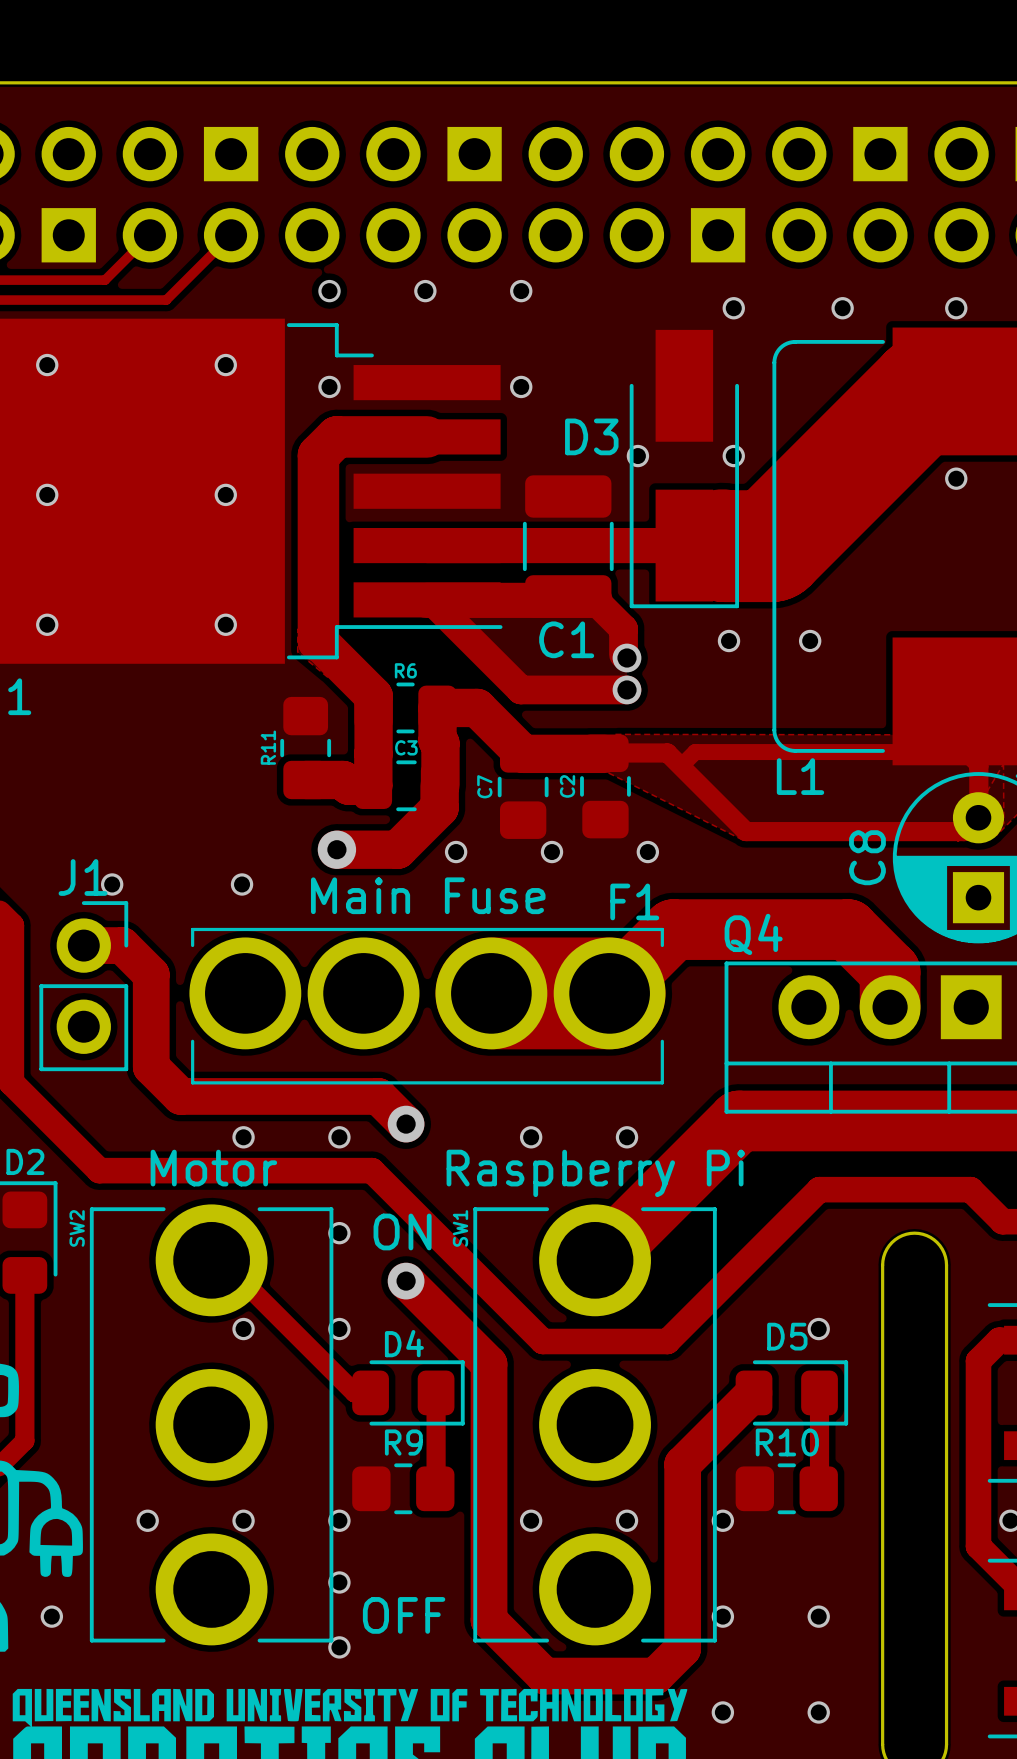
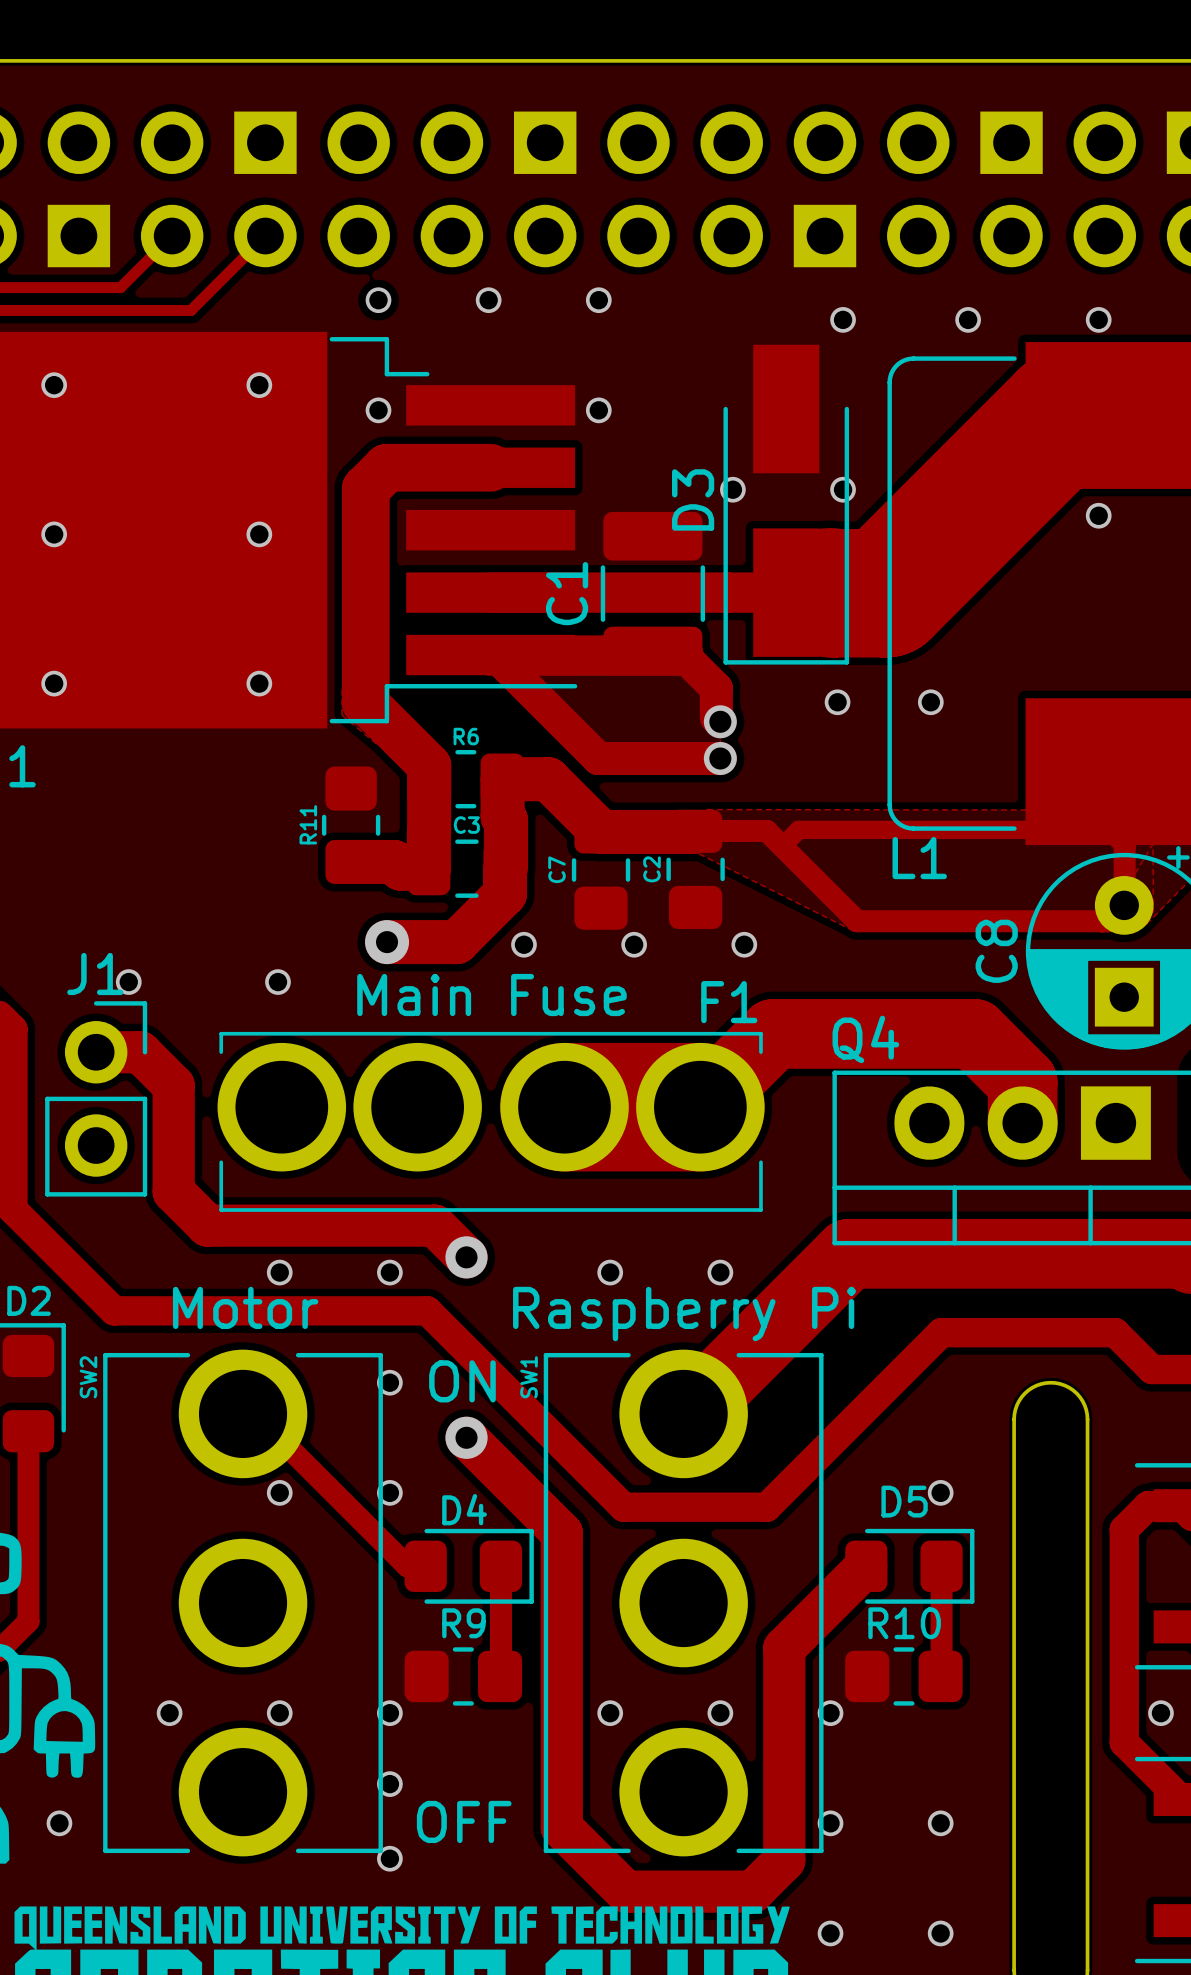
D3 name rotation: 0° (591, 436) -> 90° counterclockwise (693, 499)
C1 name rotation: 0° (566, 639) -> 90° counterclockwise (567, 593)
C1 name position: C1 (566, 639) -> C1 (567, 593)

